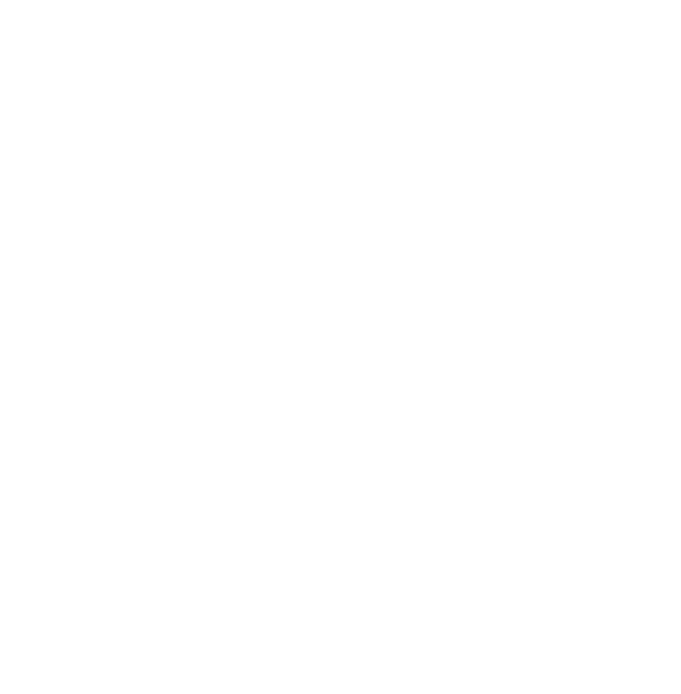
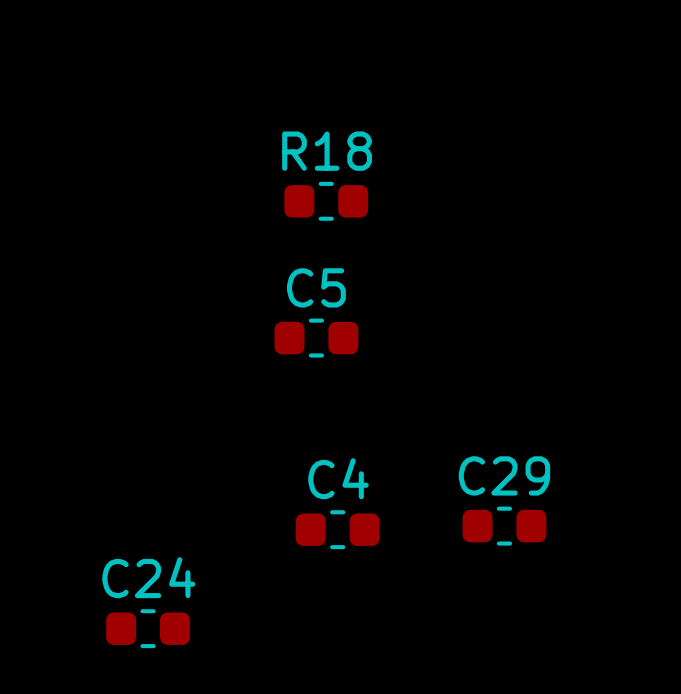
R18: none -> (326, 201)
C5: none -> (316, 338)
C29: none -> (504, 526)
C4: none -> (337, 529)
C24: none -> (148, 628)

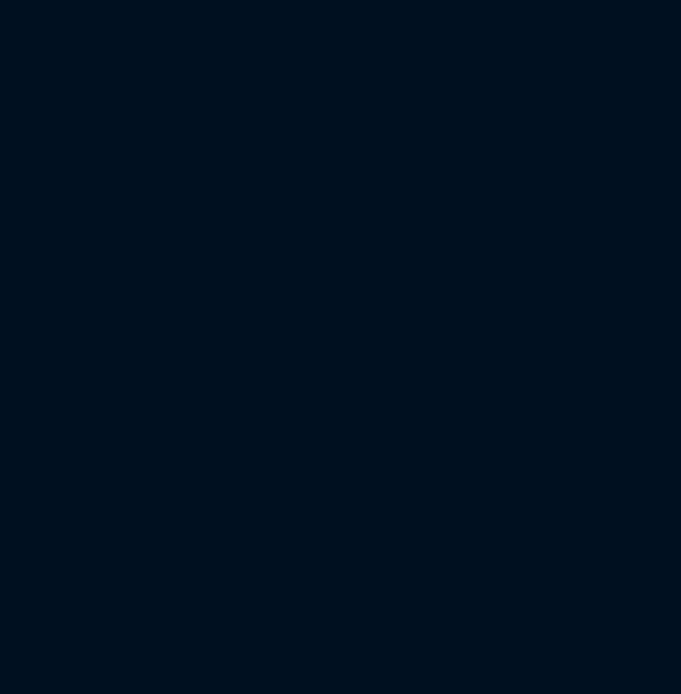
R18: (326, 201) -> none
C5: (316, 338) -> none
C29: (504, 526) -> none
C4: (337, 529) -> none
C24: (148, 628) -> none

